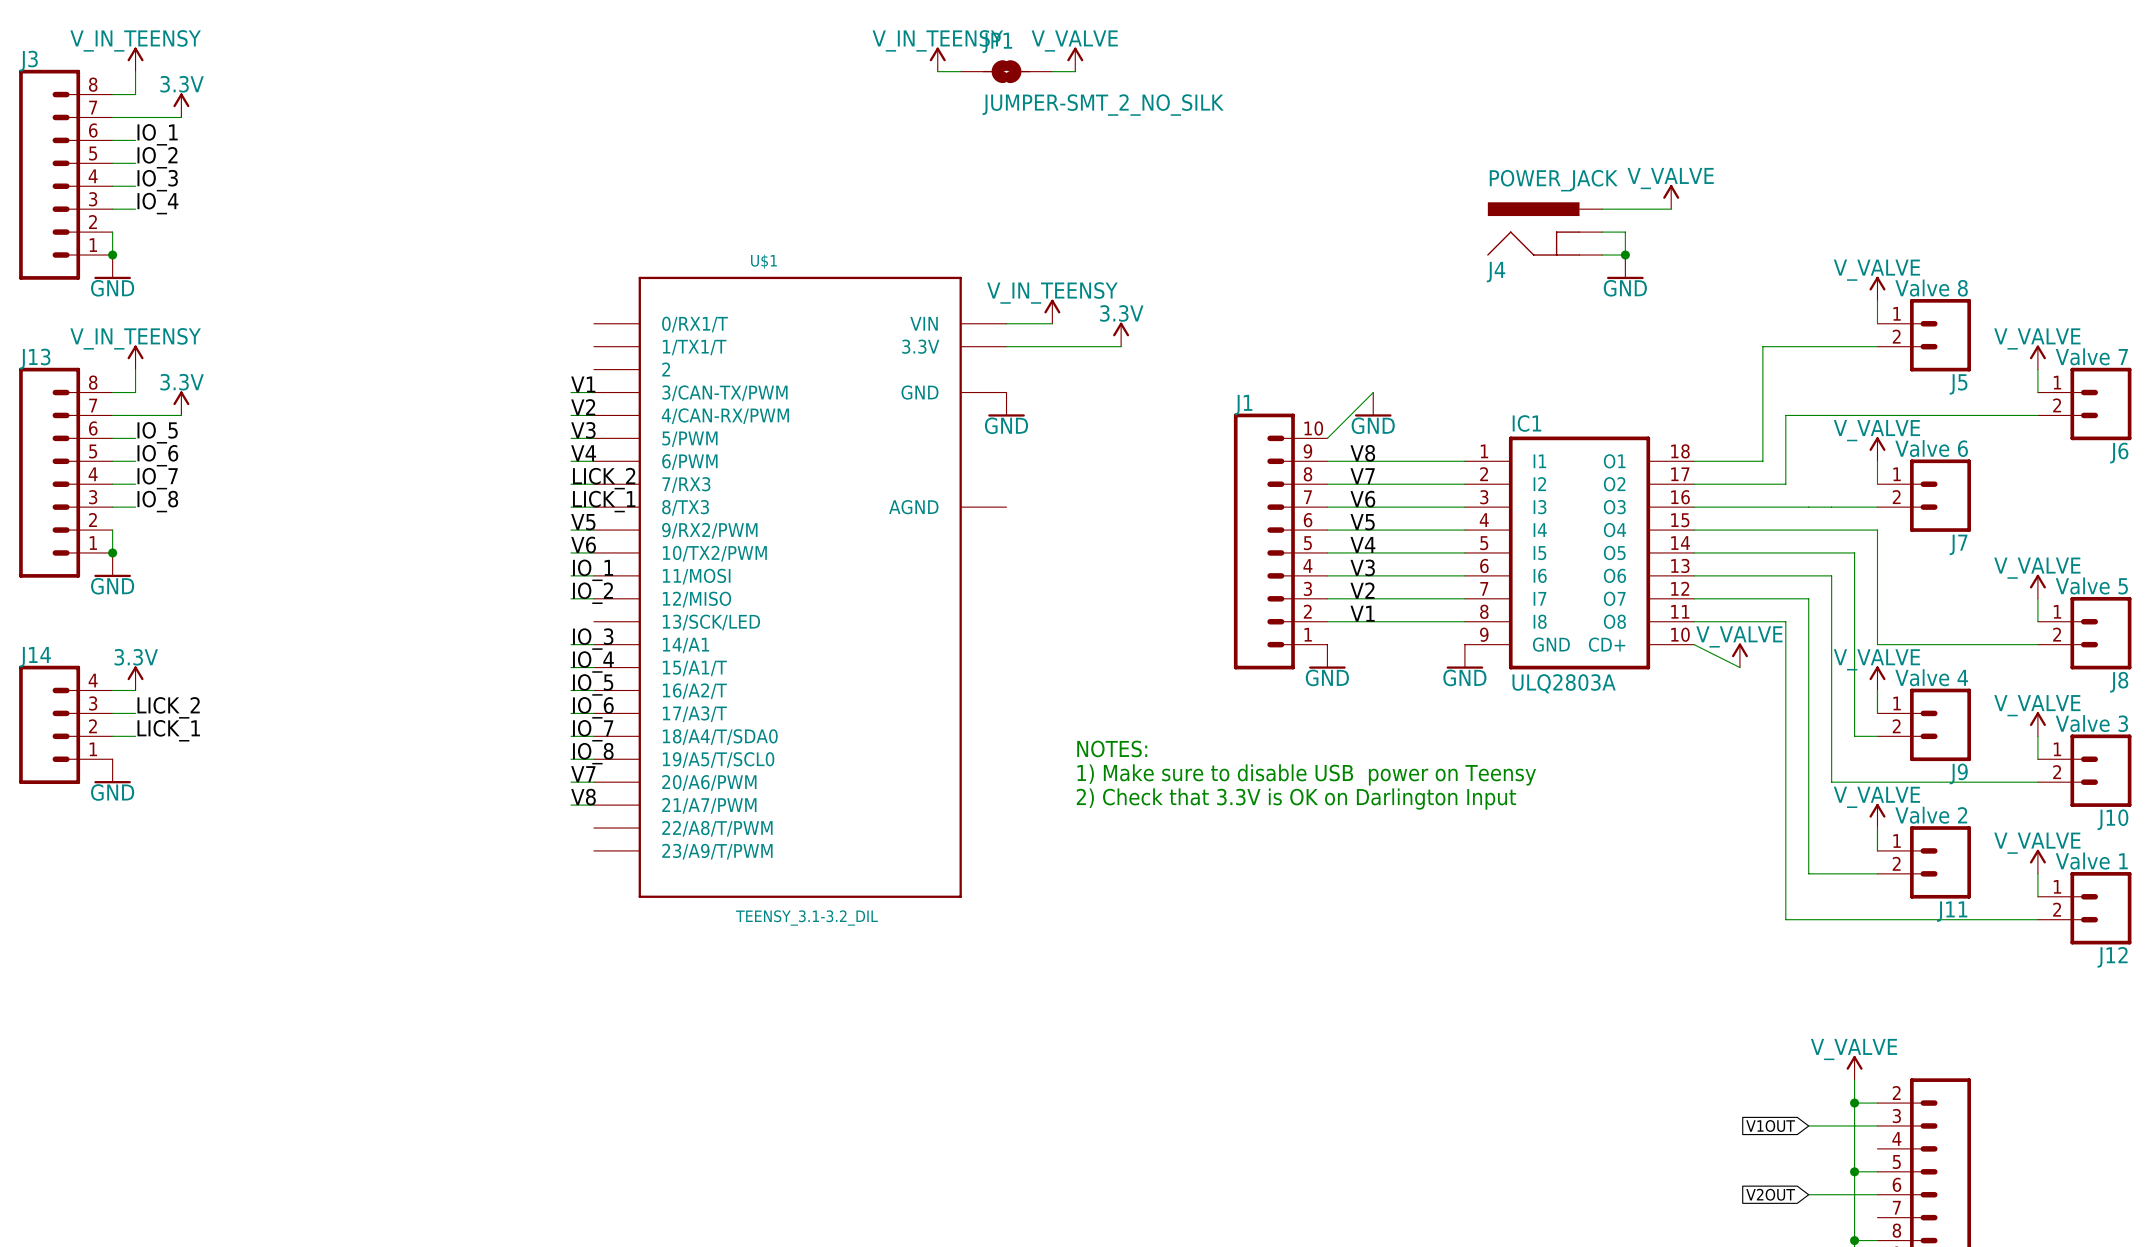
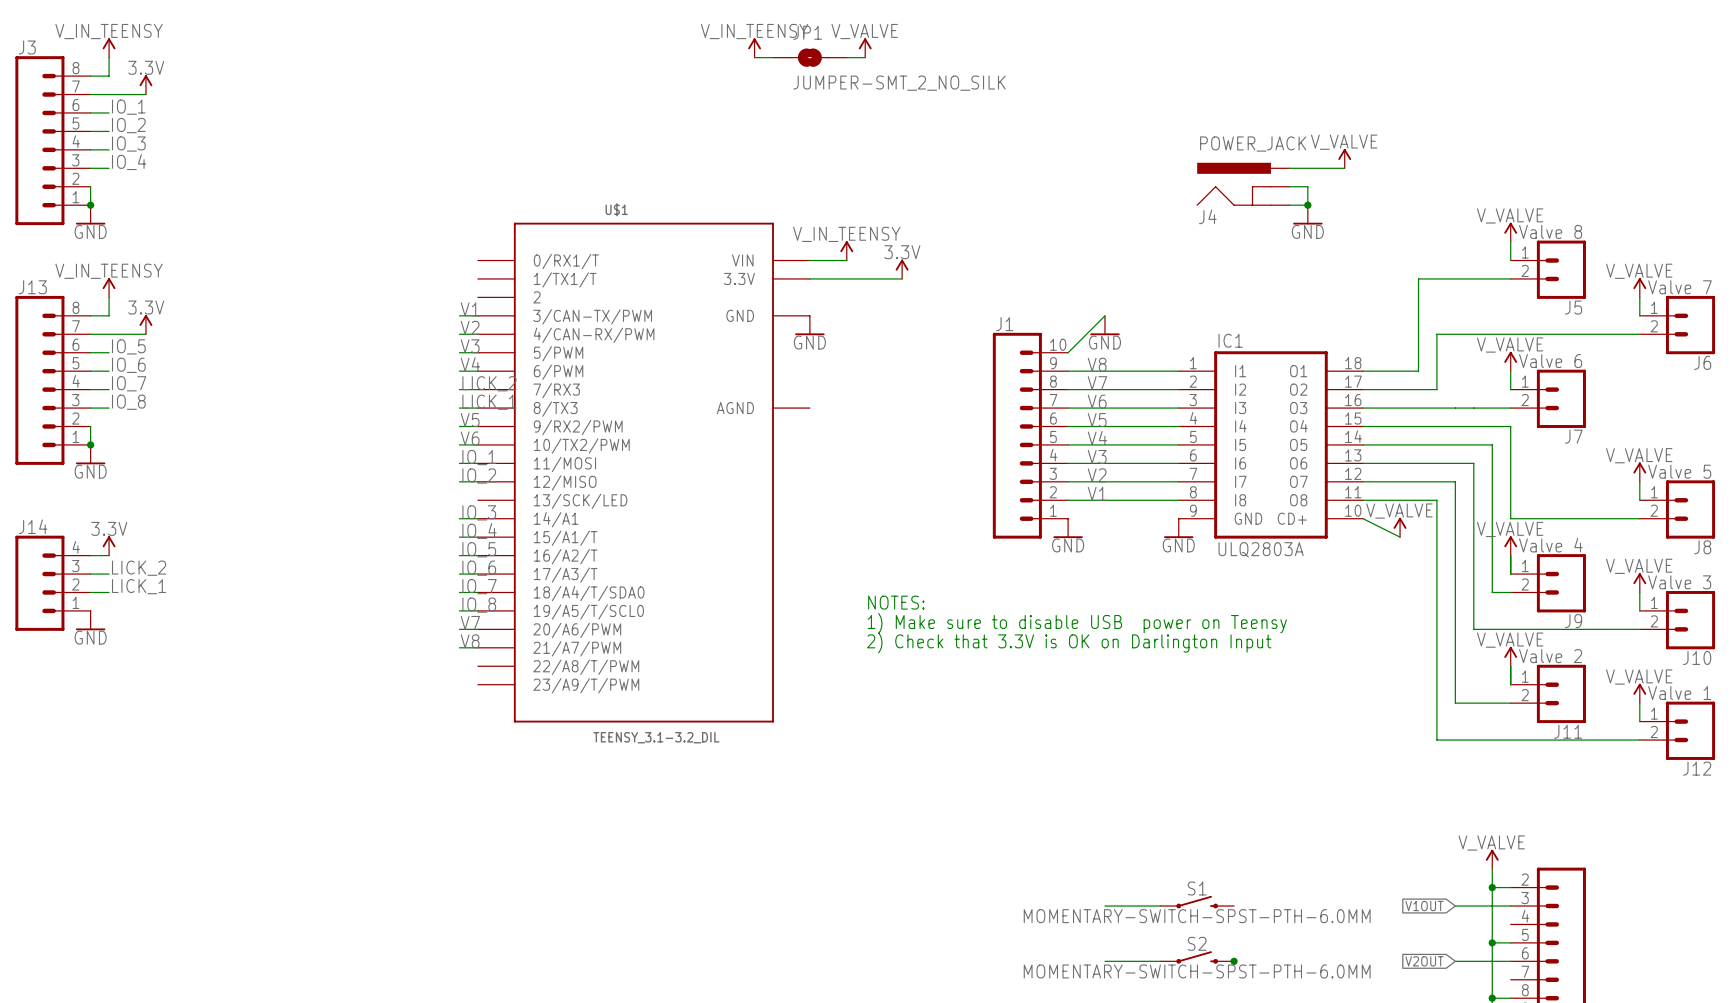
S1: none -> MOMENTARY-SWITCH-SPST-PTH-6.0MM (1197, 902)
wire: none -> (1104, 906) (1160, 906)
S2: none -> MOMENTARY-SWITCH-SPST-PTH-6.0MM (1197, 957)
wire: none -> (1104, 961) (1160, 961)
junction: none -> (1234, 961)

